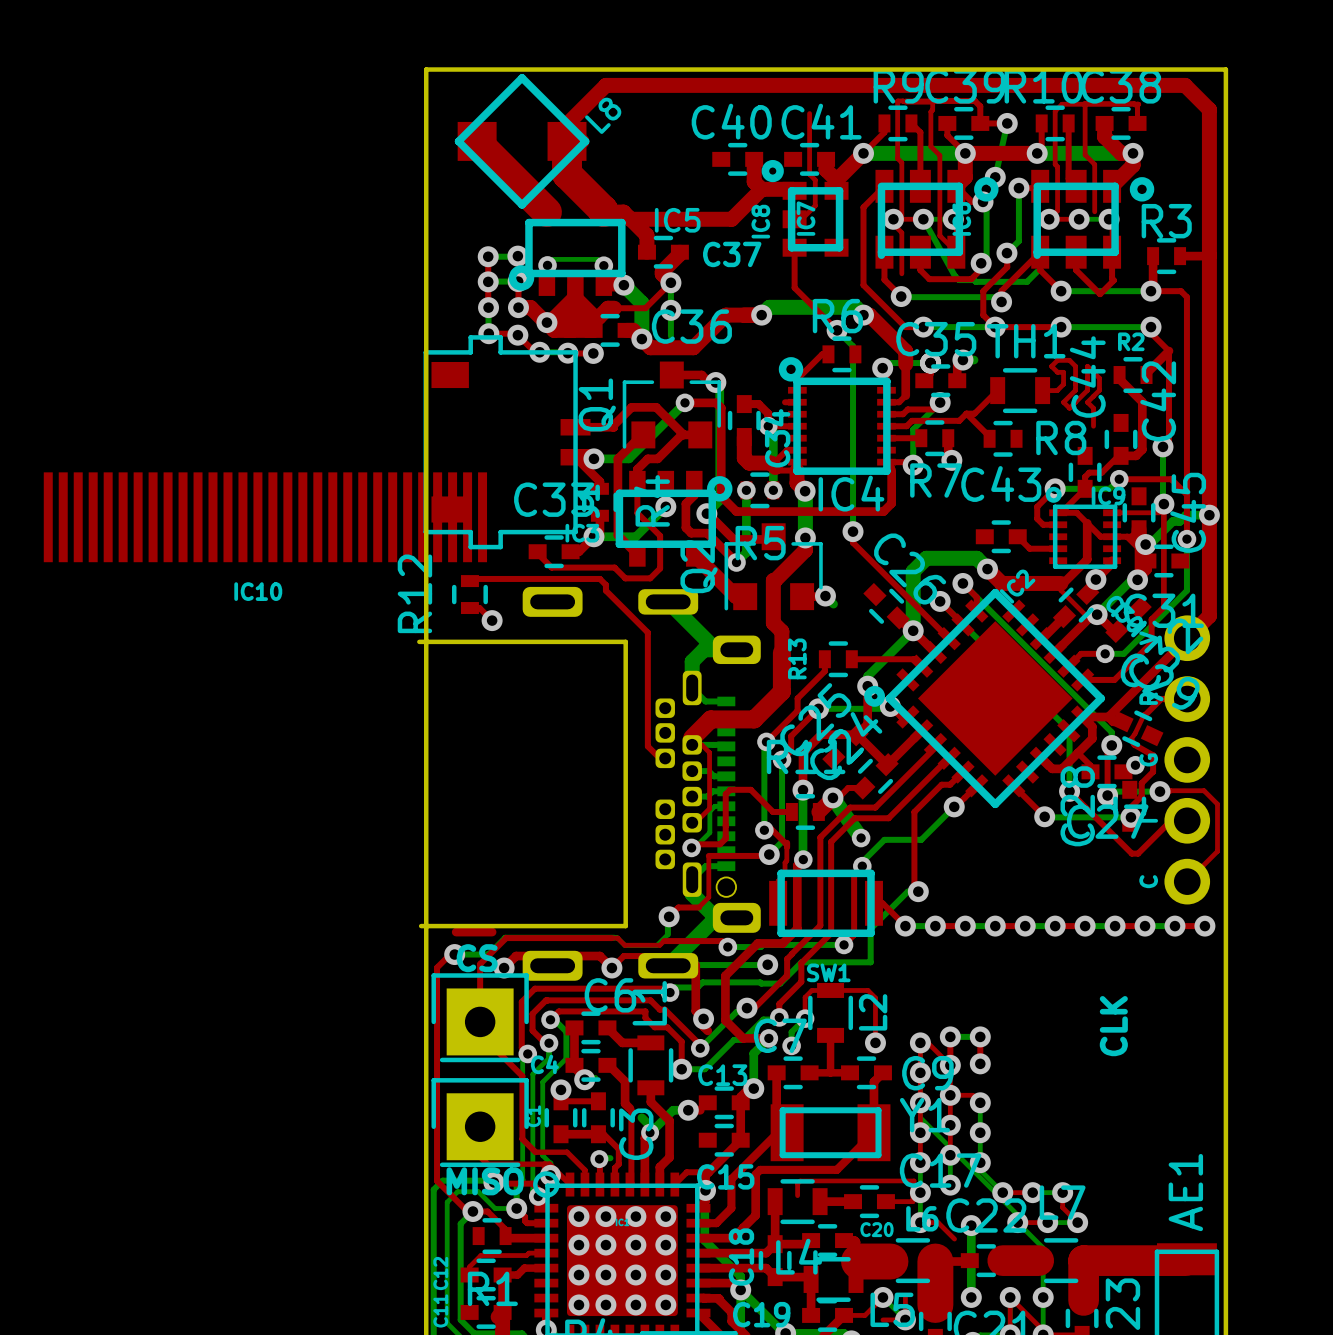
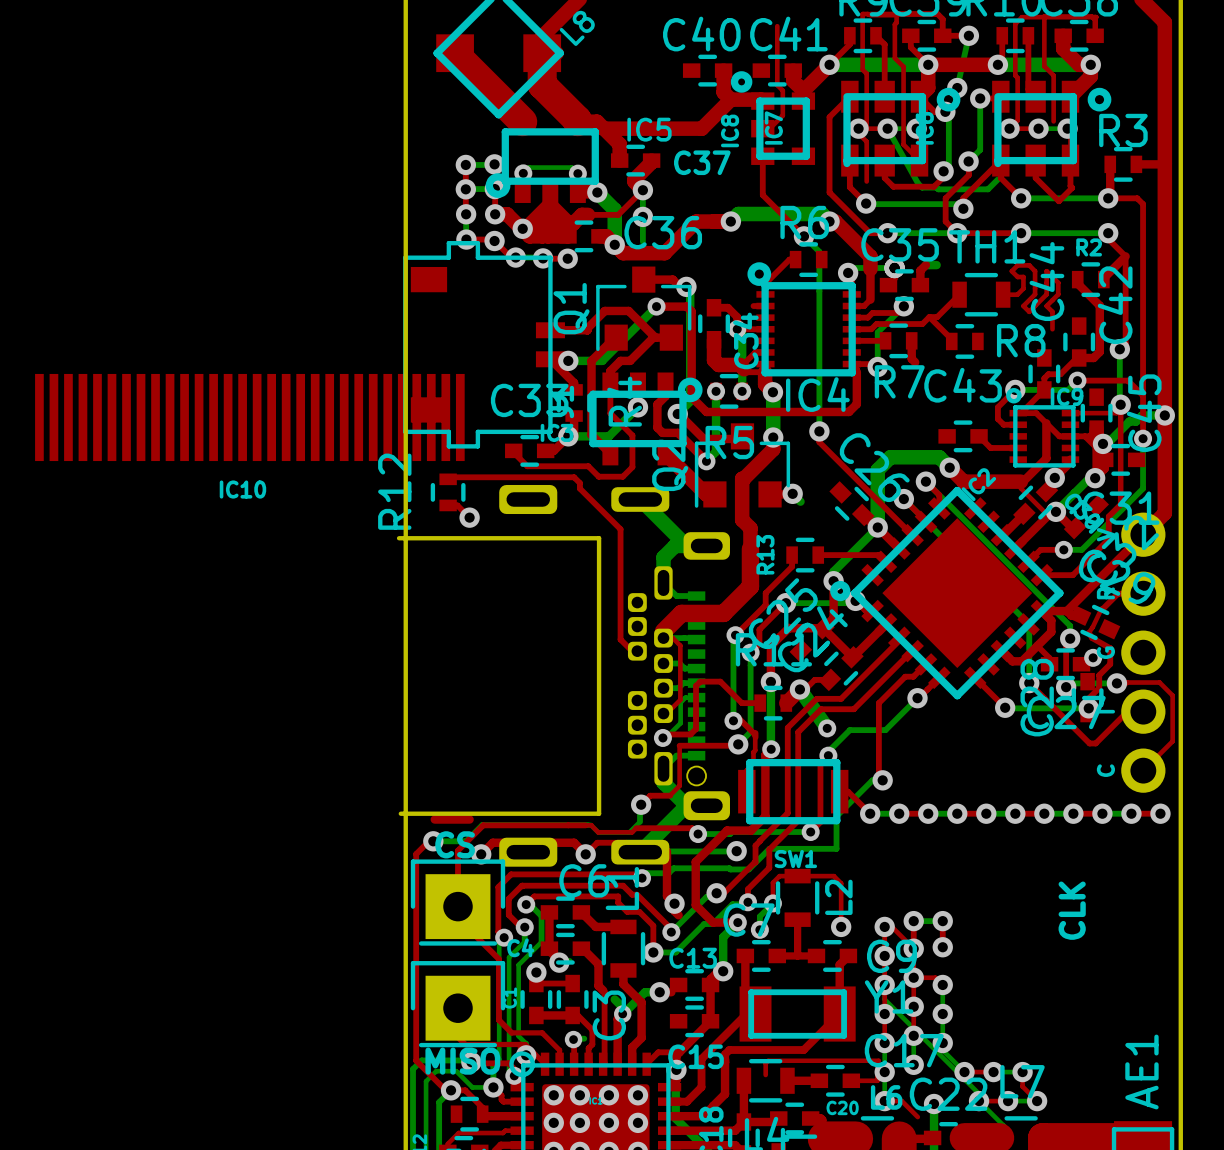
via: (962, 360) -> none
via: (951, 460) -> none

